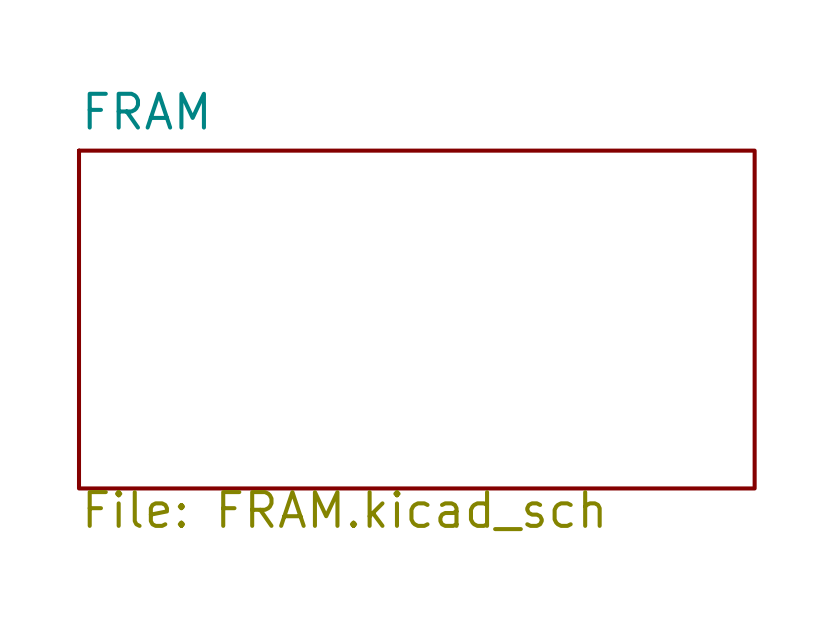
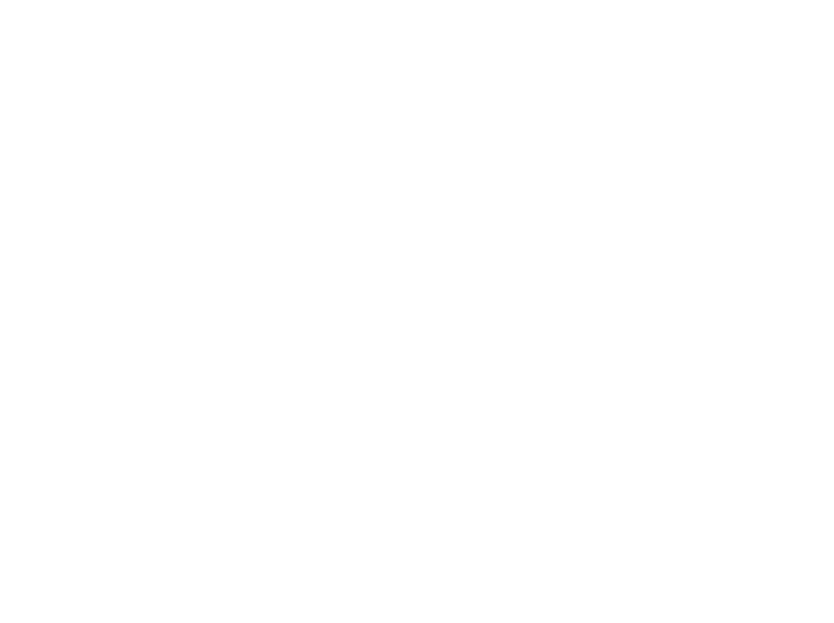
sheet FRAM: File: FRAM.kicad_sch (416, 319) -> none

